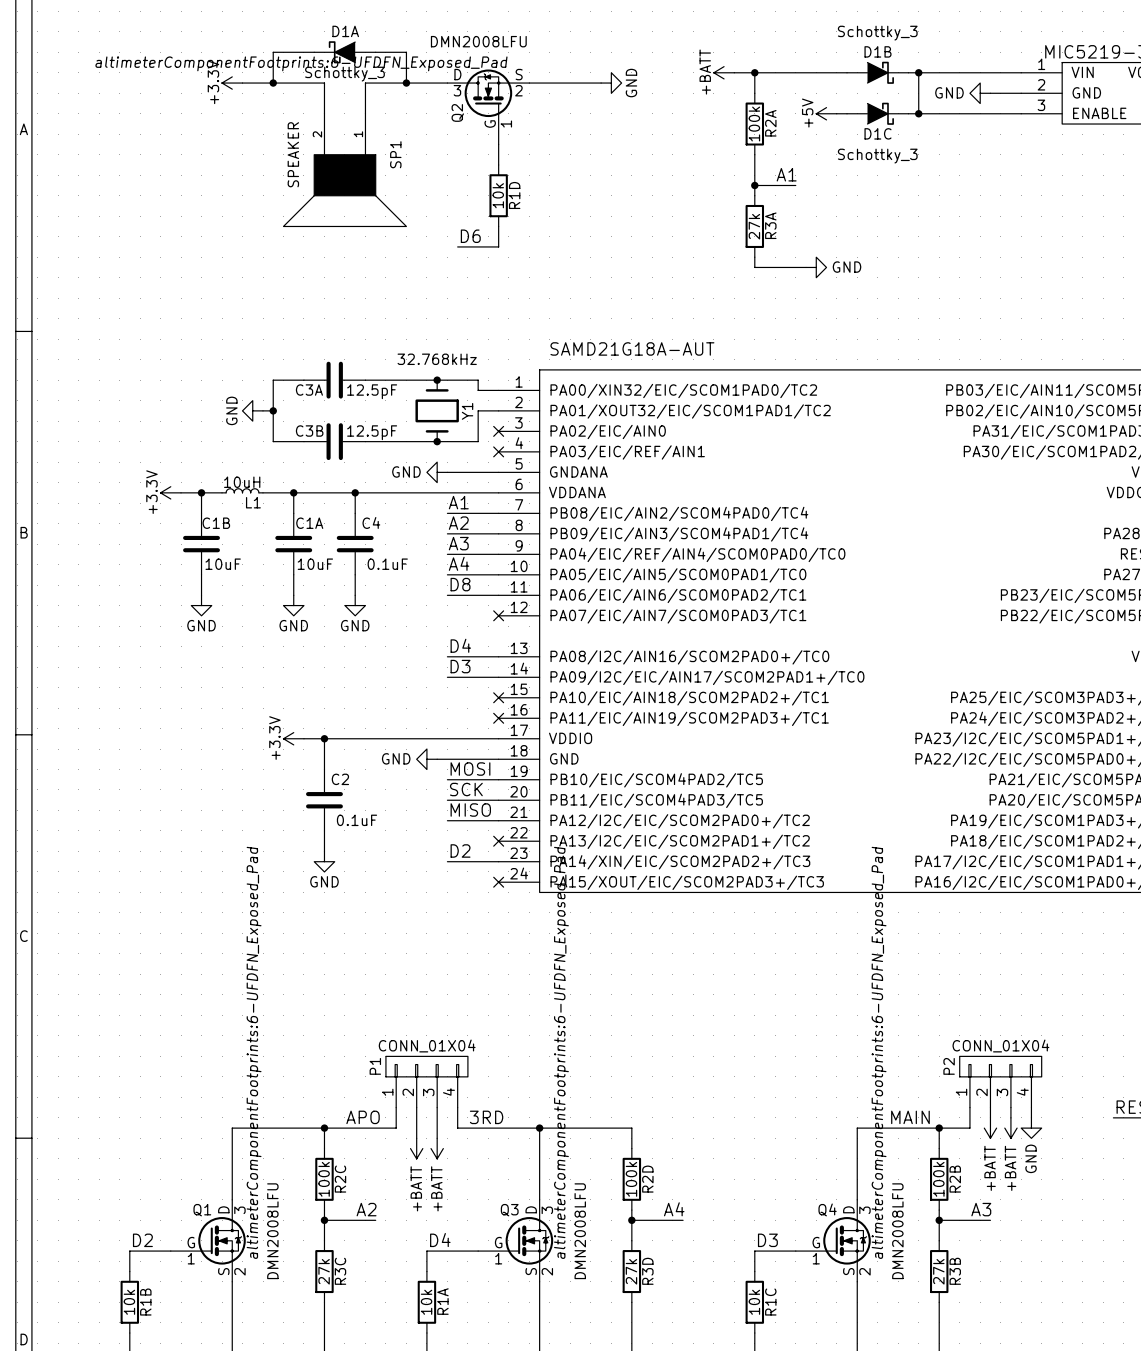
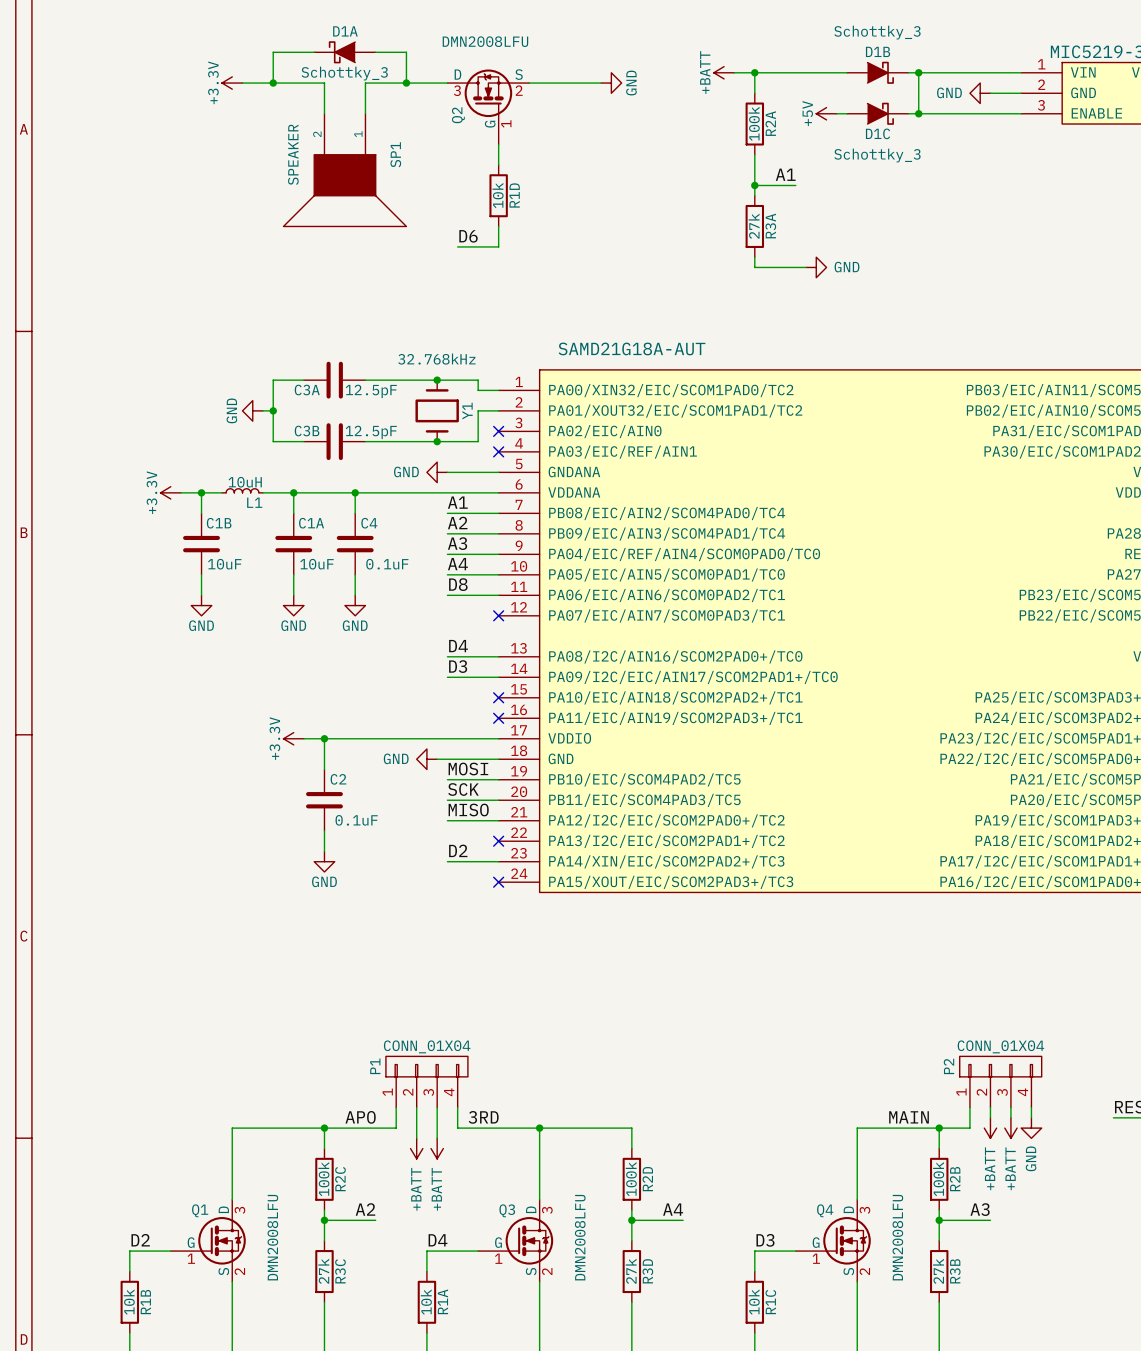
Q2 text: altimeterComponentFootprints:6-UFDFN_Exposed_Pad (301, 63) -> none
Q1 text: altimeterComponentFootprints:6-UFDFN_Exposed_Pad (254, 1052) -> none
Q3 text: altimeterComponentFootprints:6-UFDFN_Exposed_Pad (561, 1052) -> none
Q4 text: altimeterComponentFootprints:6-UFDFN_Exposed_Pad (879, 1052) -> none

